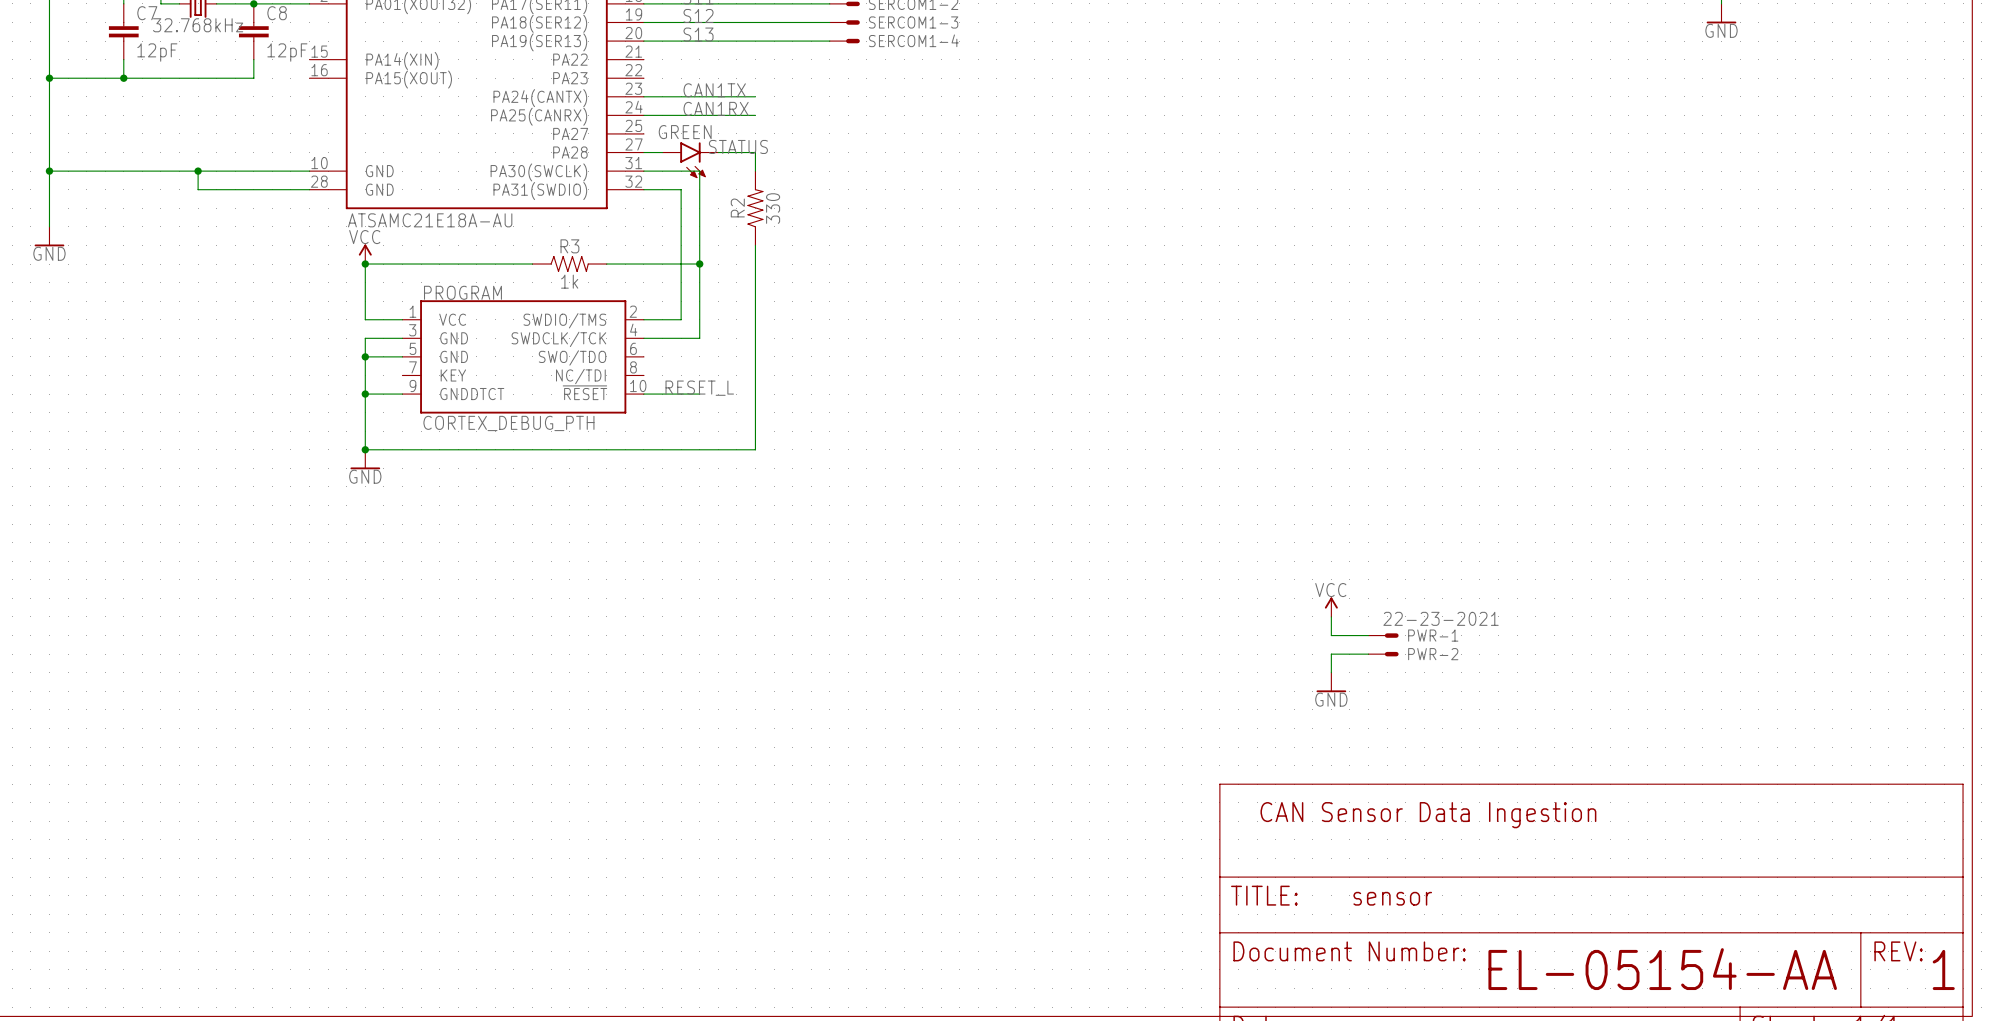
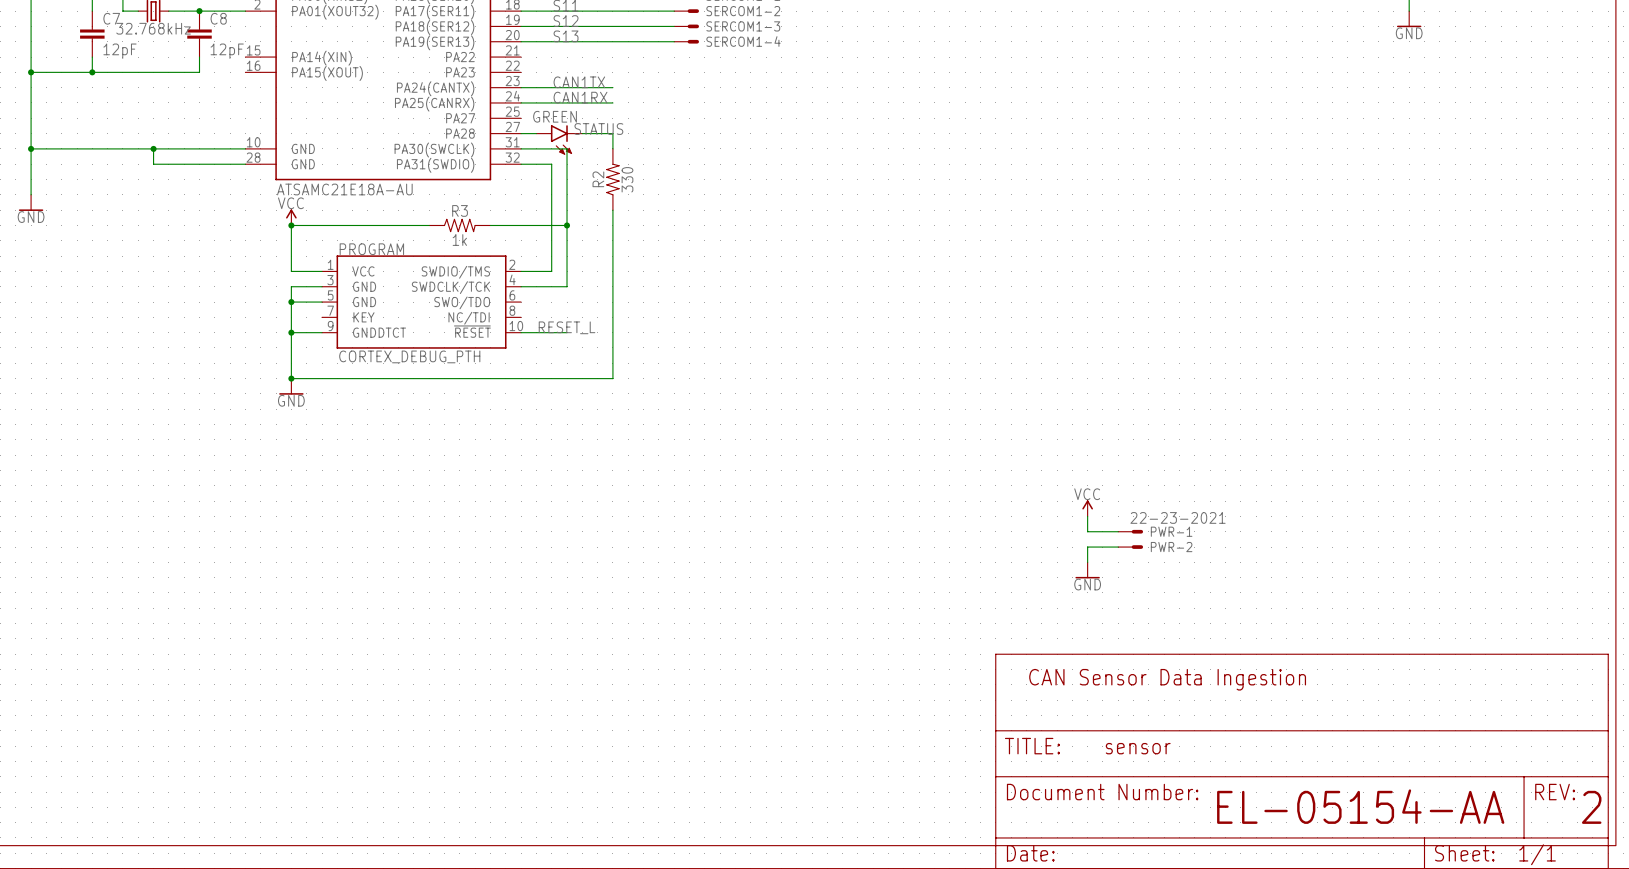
text: 1 (1943, 969) -> 2 (1591, 807)

